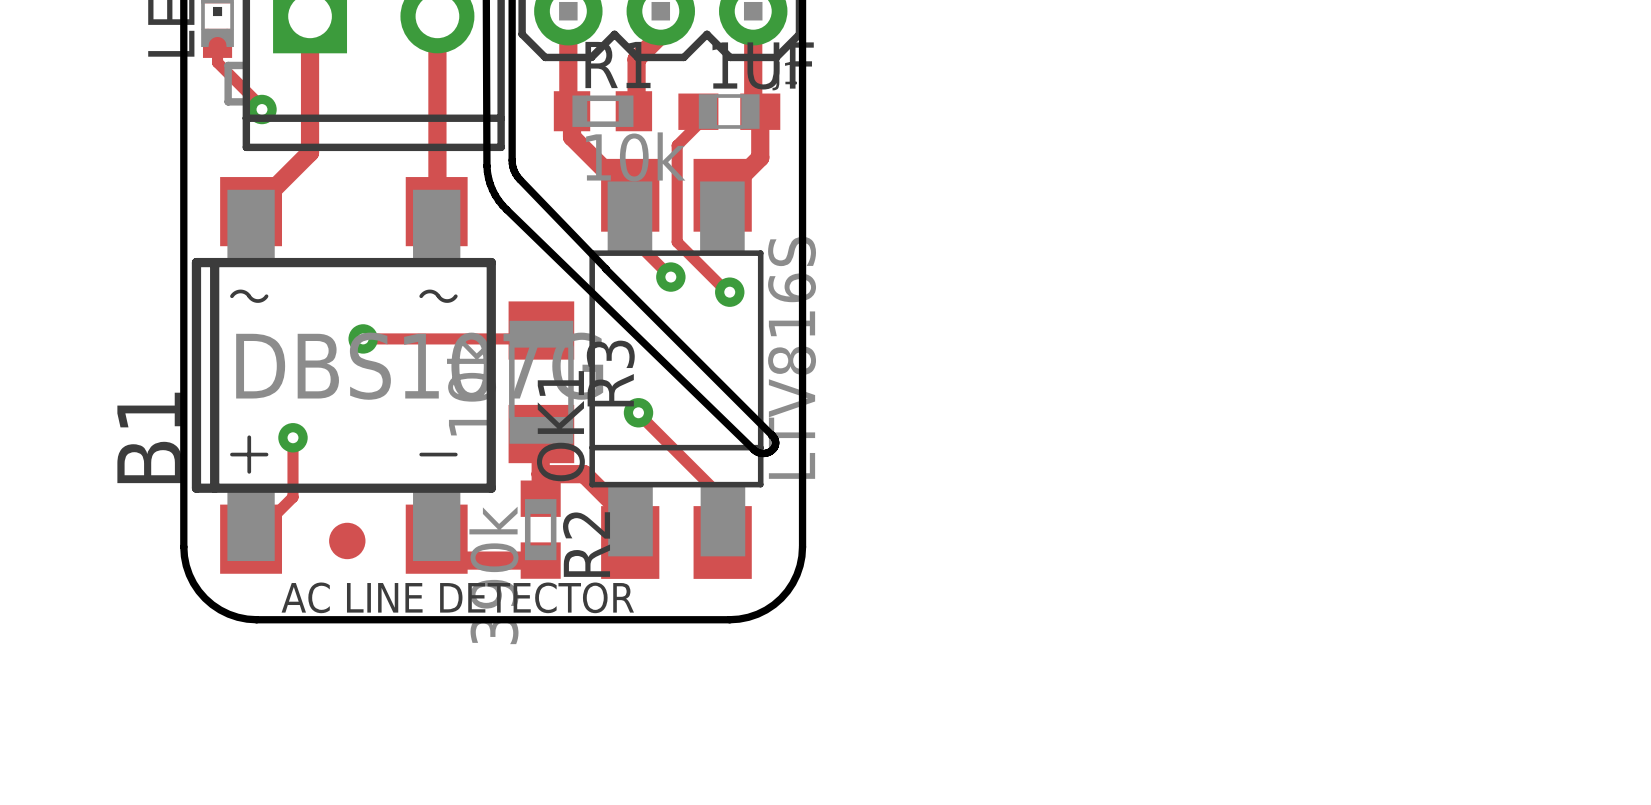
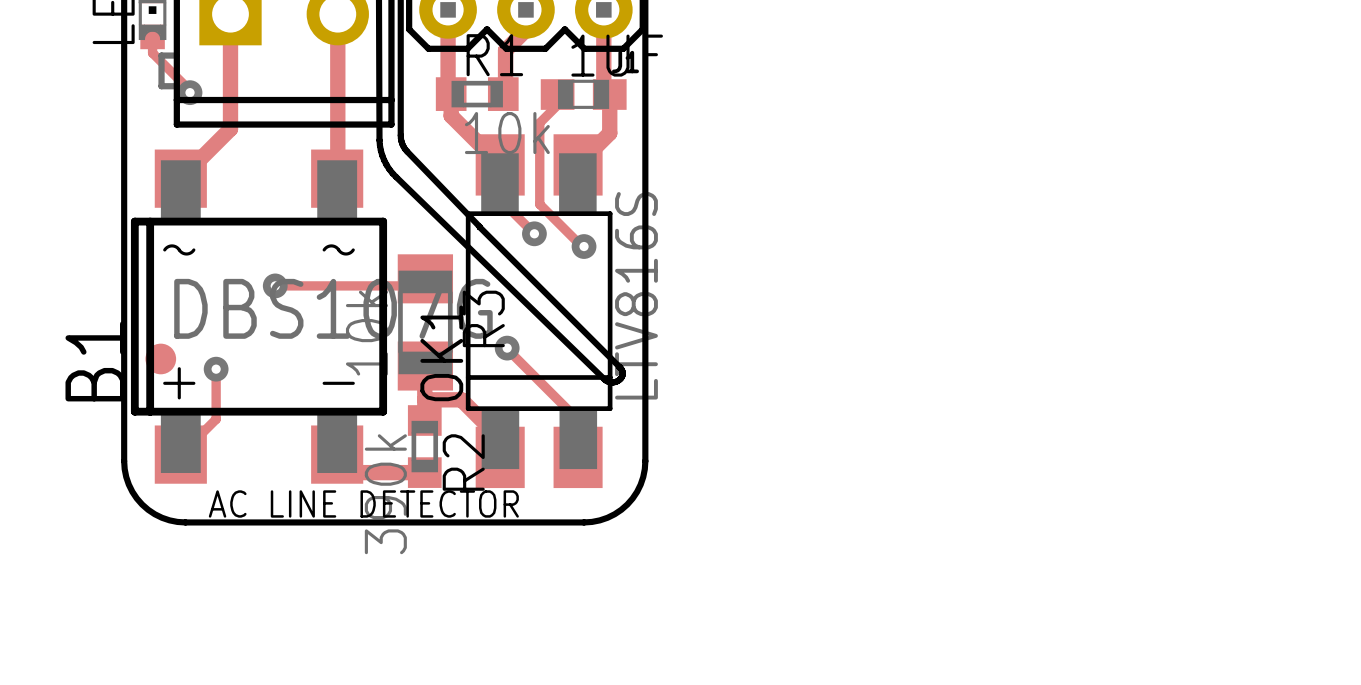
part position: (347, 540) -> (160, 358)

